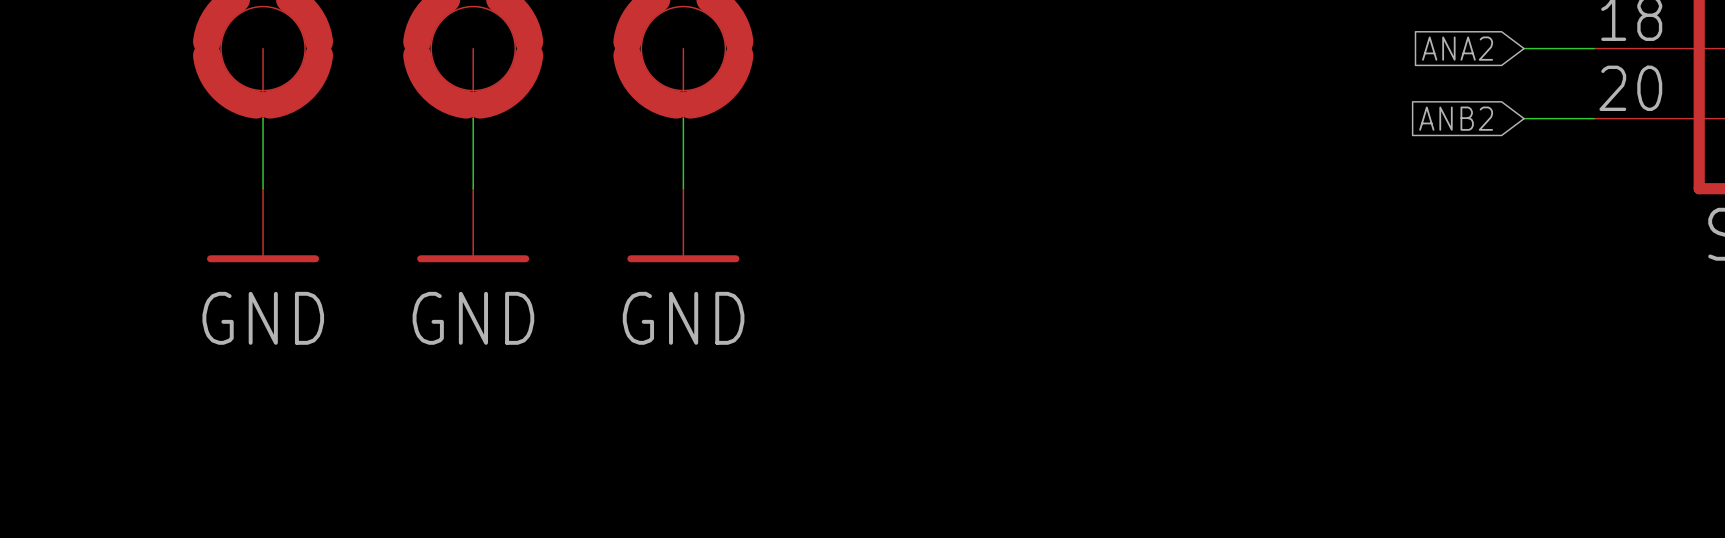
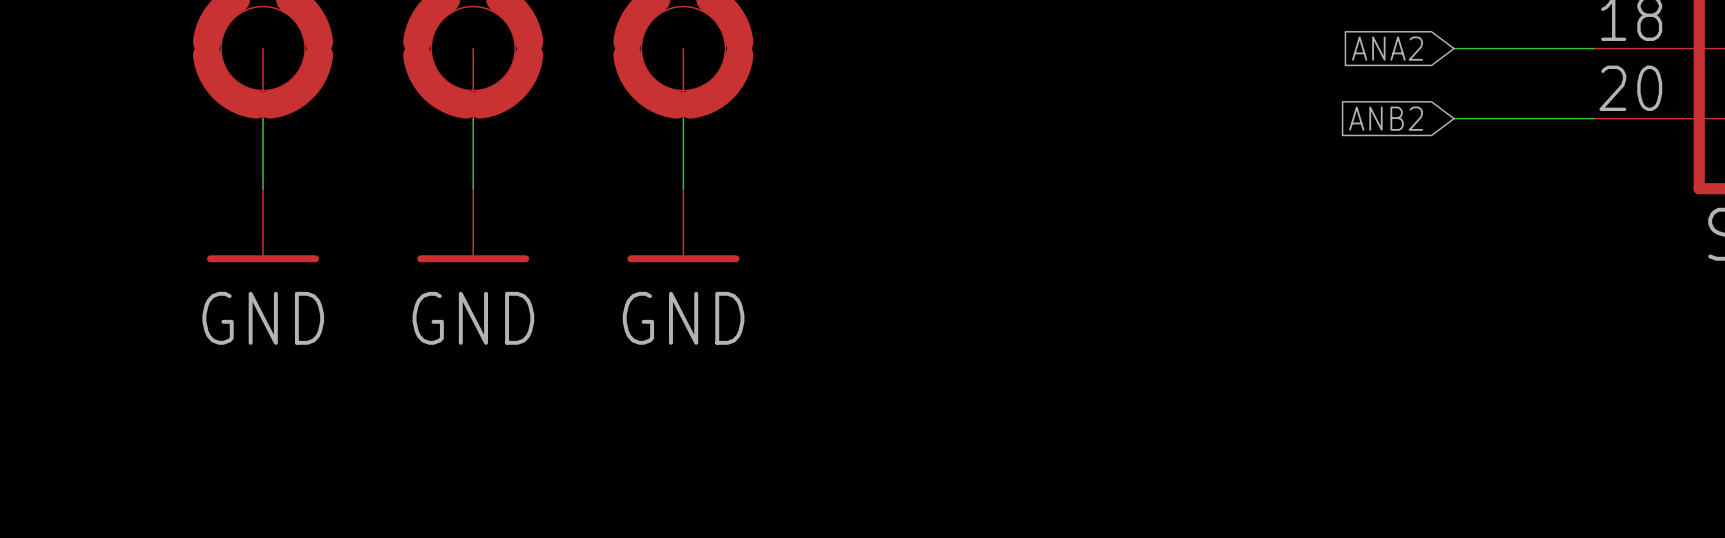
wire: none -> (1454, 48) (1524, 48)
global label position: ANA2 (1457, 48) -> ANA2 (1387, 48)
wire: none -> (1454, 118) (1524, 118)
global label position: ANB2 (1456, 118) -> ANB2 (1386, 118)

